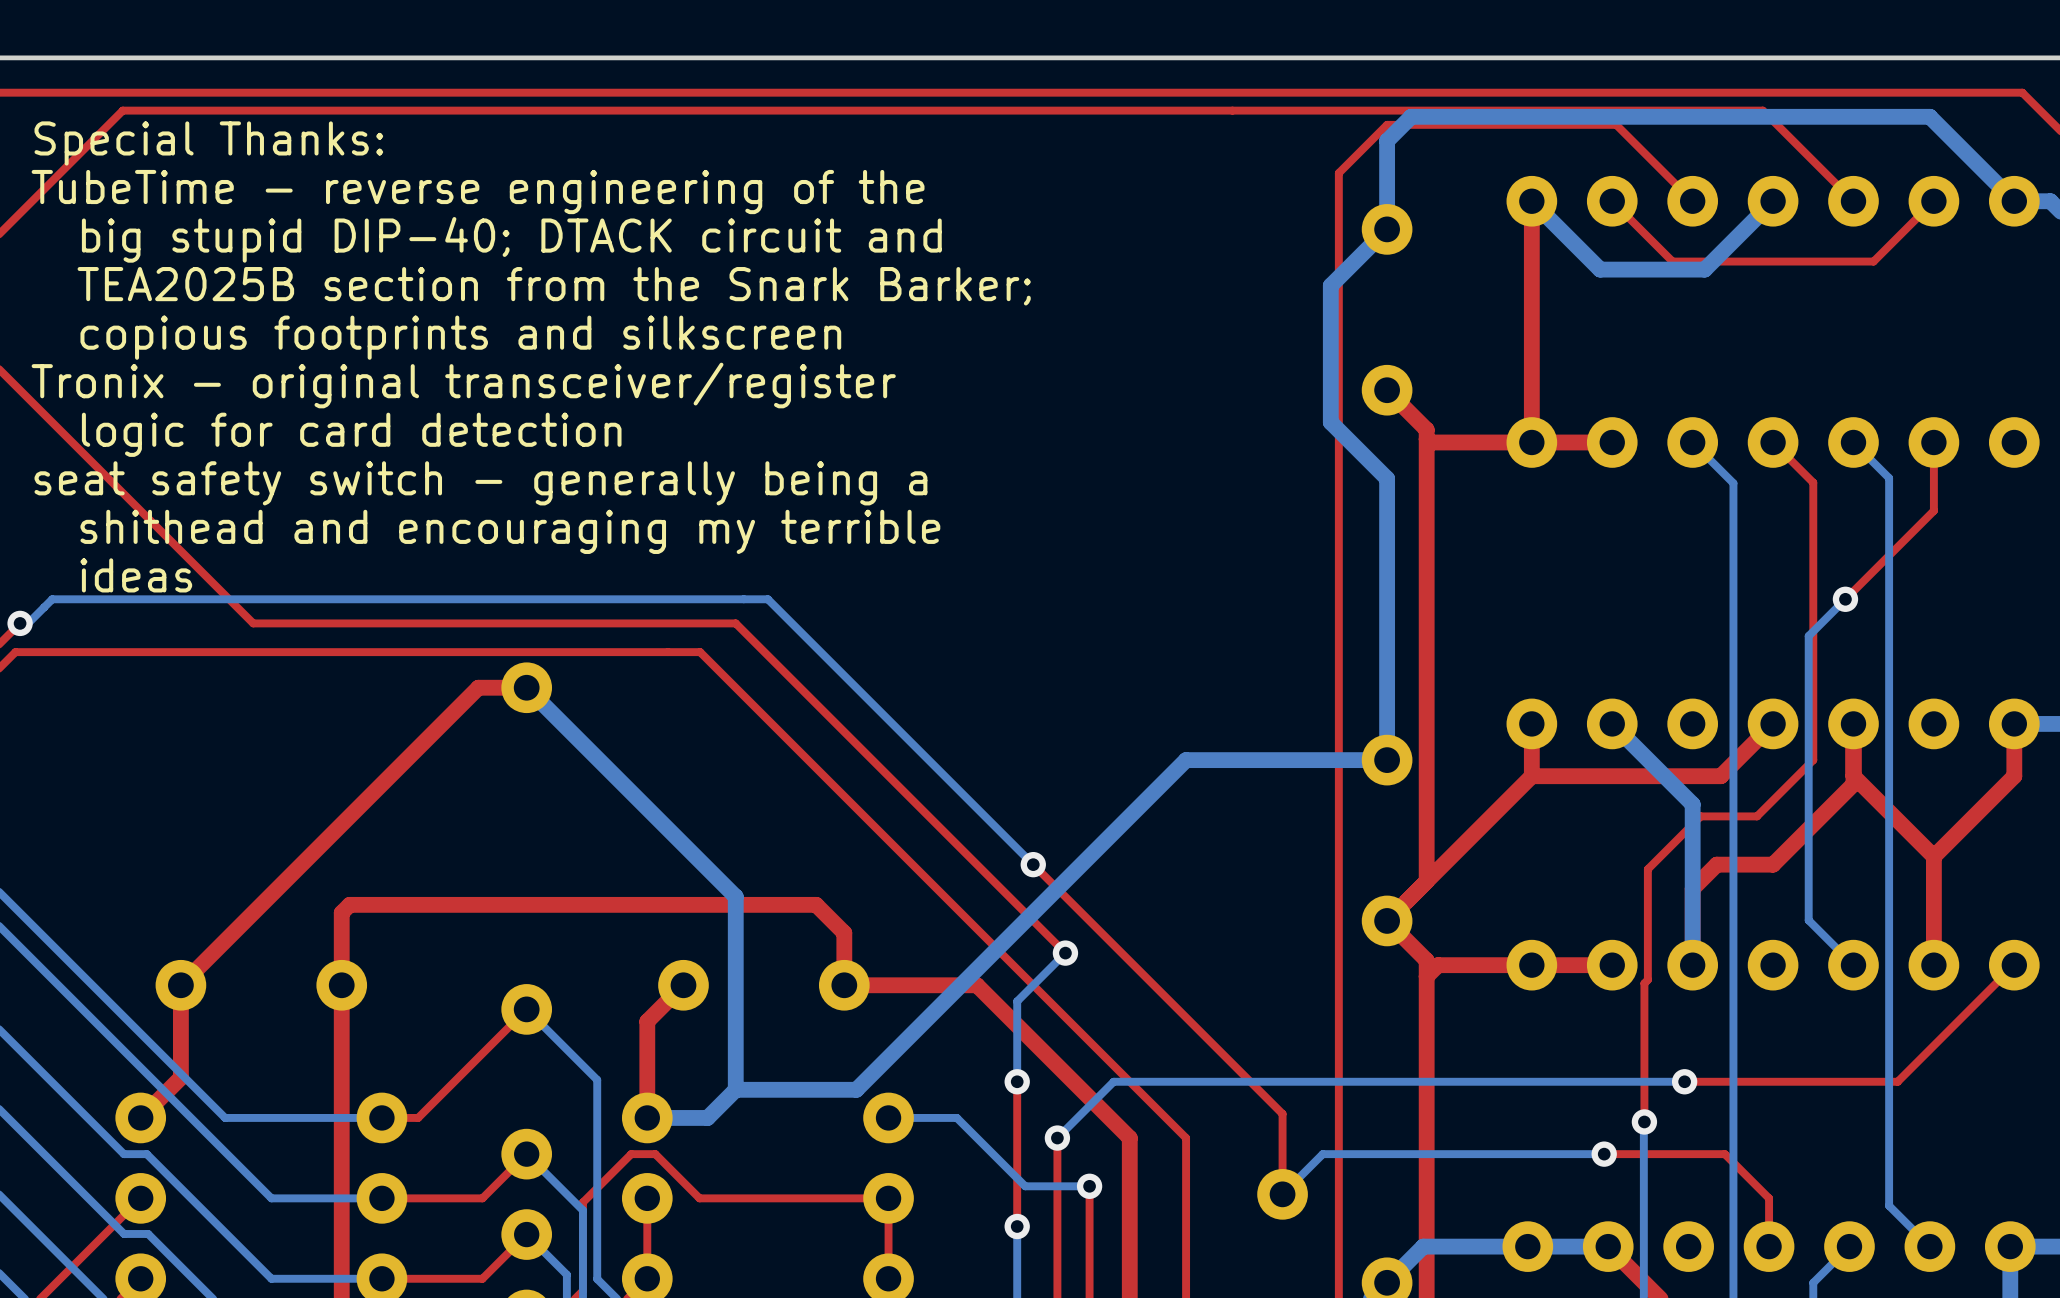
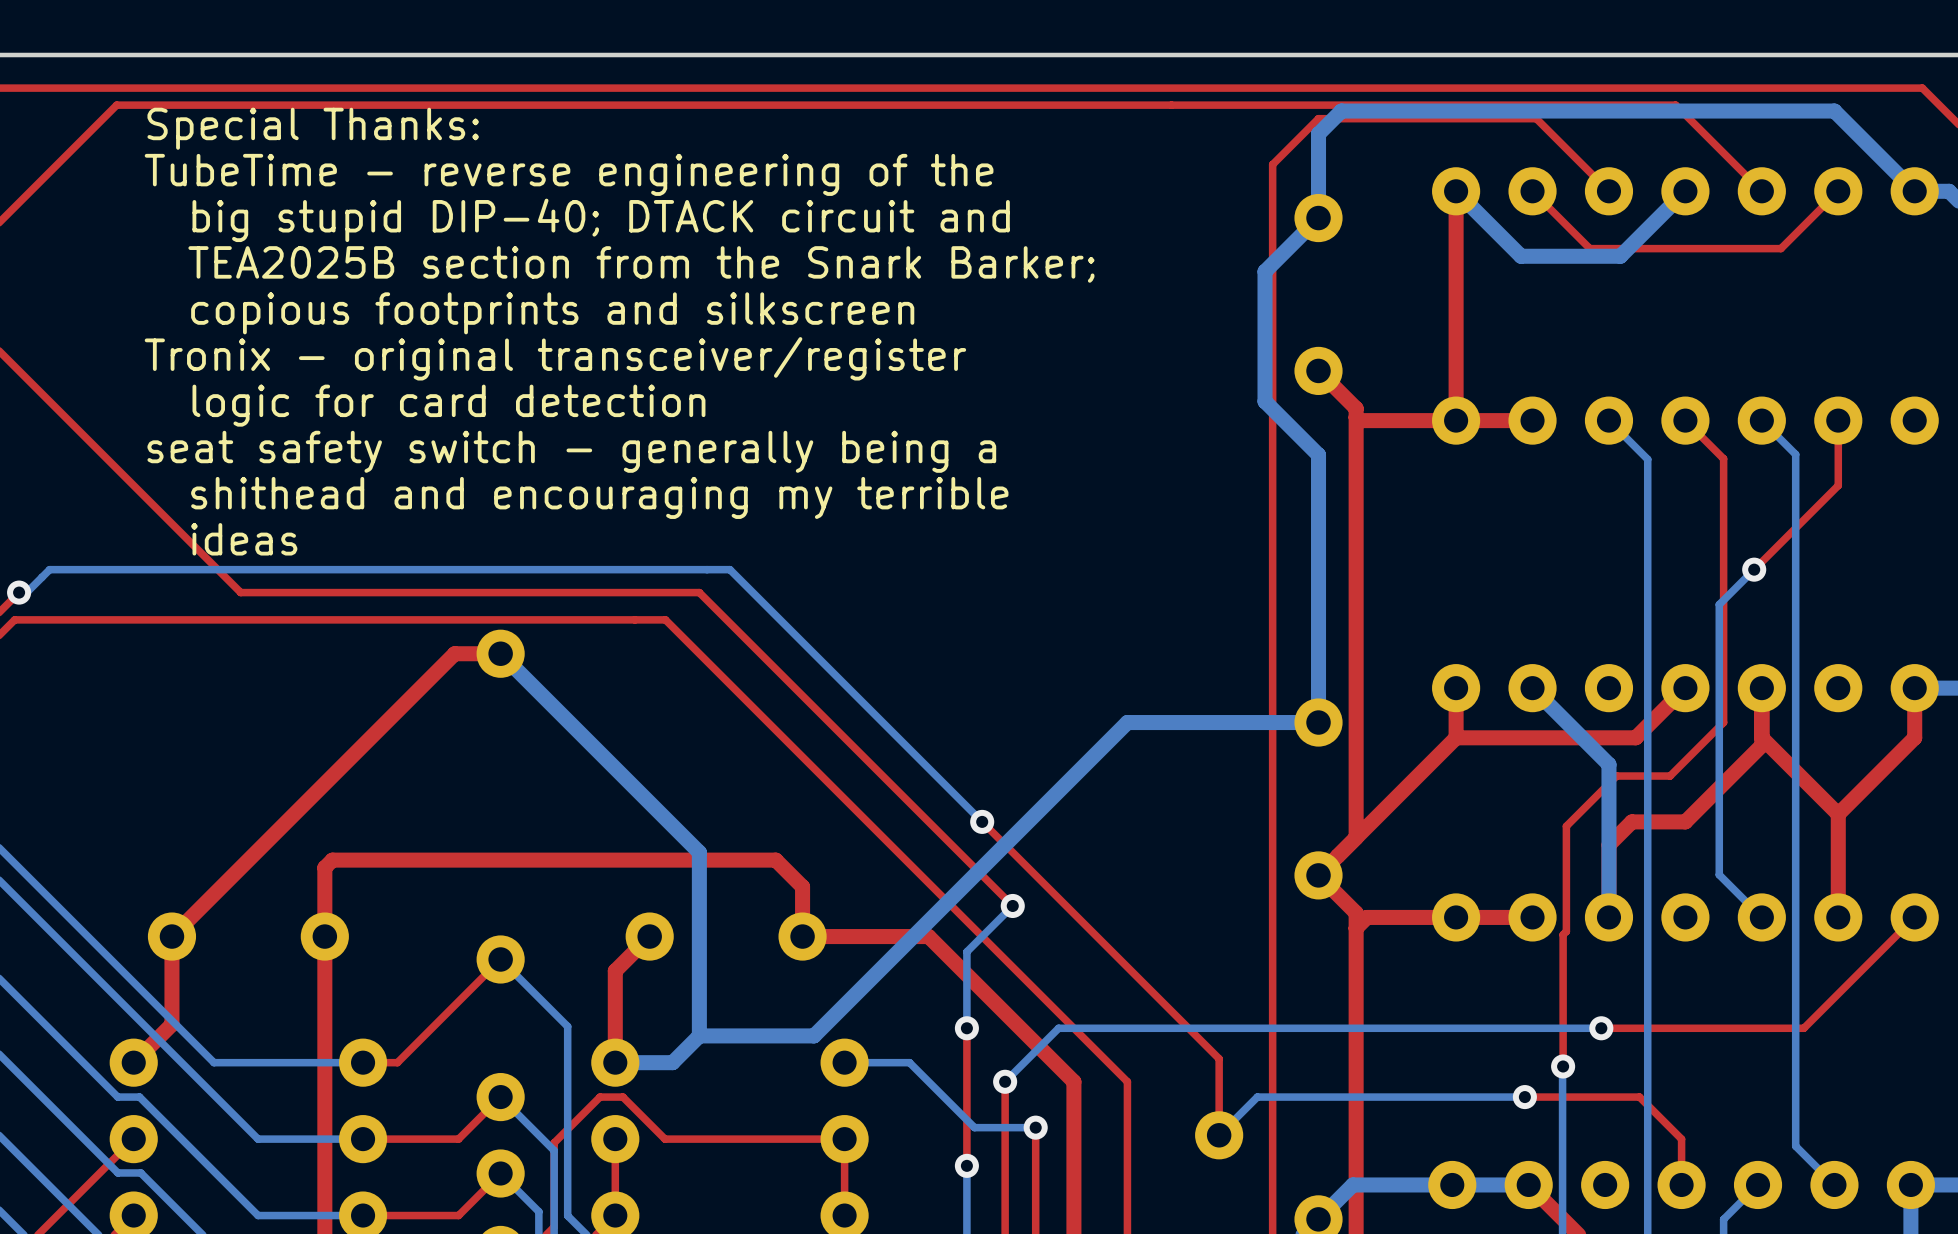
text position: Special Thanks: (208, 143) -> Special Thanks: (313, 128)
text position: TubeTime - reverse engineering of the (478, 192) -> TubeTime - reverse engineering of the (569, 174)
text position: big stupid DIP-40; DTACK circuit and (511, 239) -> big stupid DIP-40; DTACK circuit and (601, 220)
text position: TEA2025B section from the Snark Barker; (554, 286) -> TEA2025B section from the Snark Barker; (641, 264)
text position: copious footprints and silkscreen (460, 337) -> copious footprints and silkscreen (552, 313)
text position: Tronix - original transceiver/register (463, 385) -> Tronix - original transceiver/register (555, 358)
text position: logic for card detection (351, 434) -> logic for card detection (448, 405)
text position: seat safety switch - generally being a (480, 483) -> seat safety switch - generally being a (571, 451)
text position: shithead and encouraging my terrible (510, 531) -> shithead and encouraging my terrible (599, 497)
text position: ideas (136, 575) -> ideas (244, 539)

